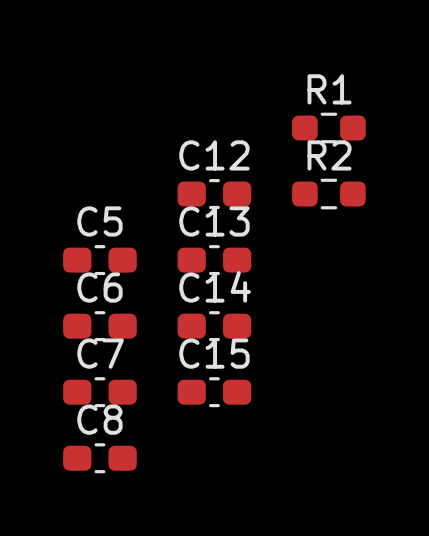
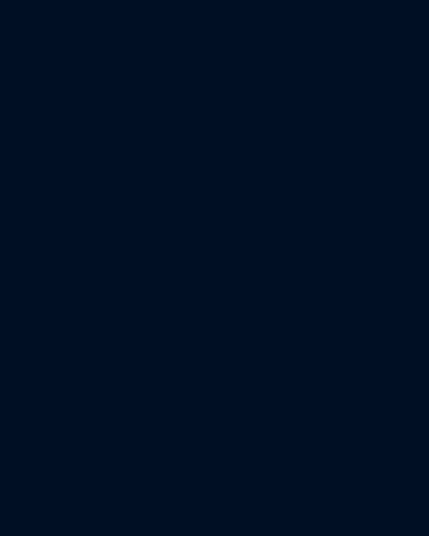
R1: (328, 127) -> none
C12: (214, 194) -> none
R2: (328, 194) -> none
C5: (99, 260) -> none
C13: (214, 260) -> none
C6: (99, 326) -> none
C14: (214, 326) -> none
C7: (99, 392) -> none
C15: (214, 392) -> none
C8: (99, 458) -> none

